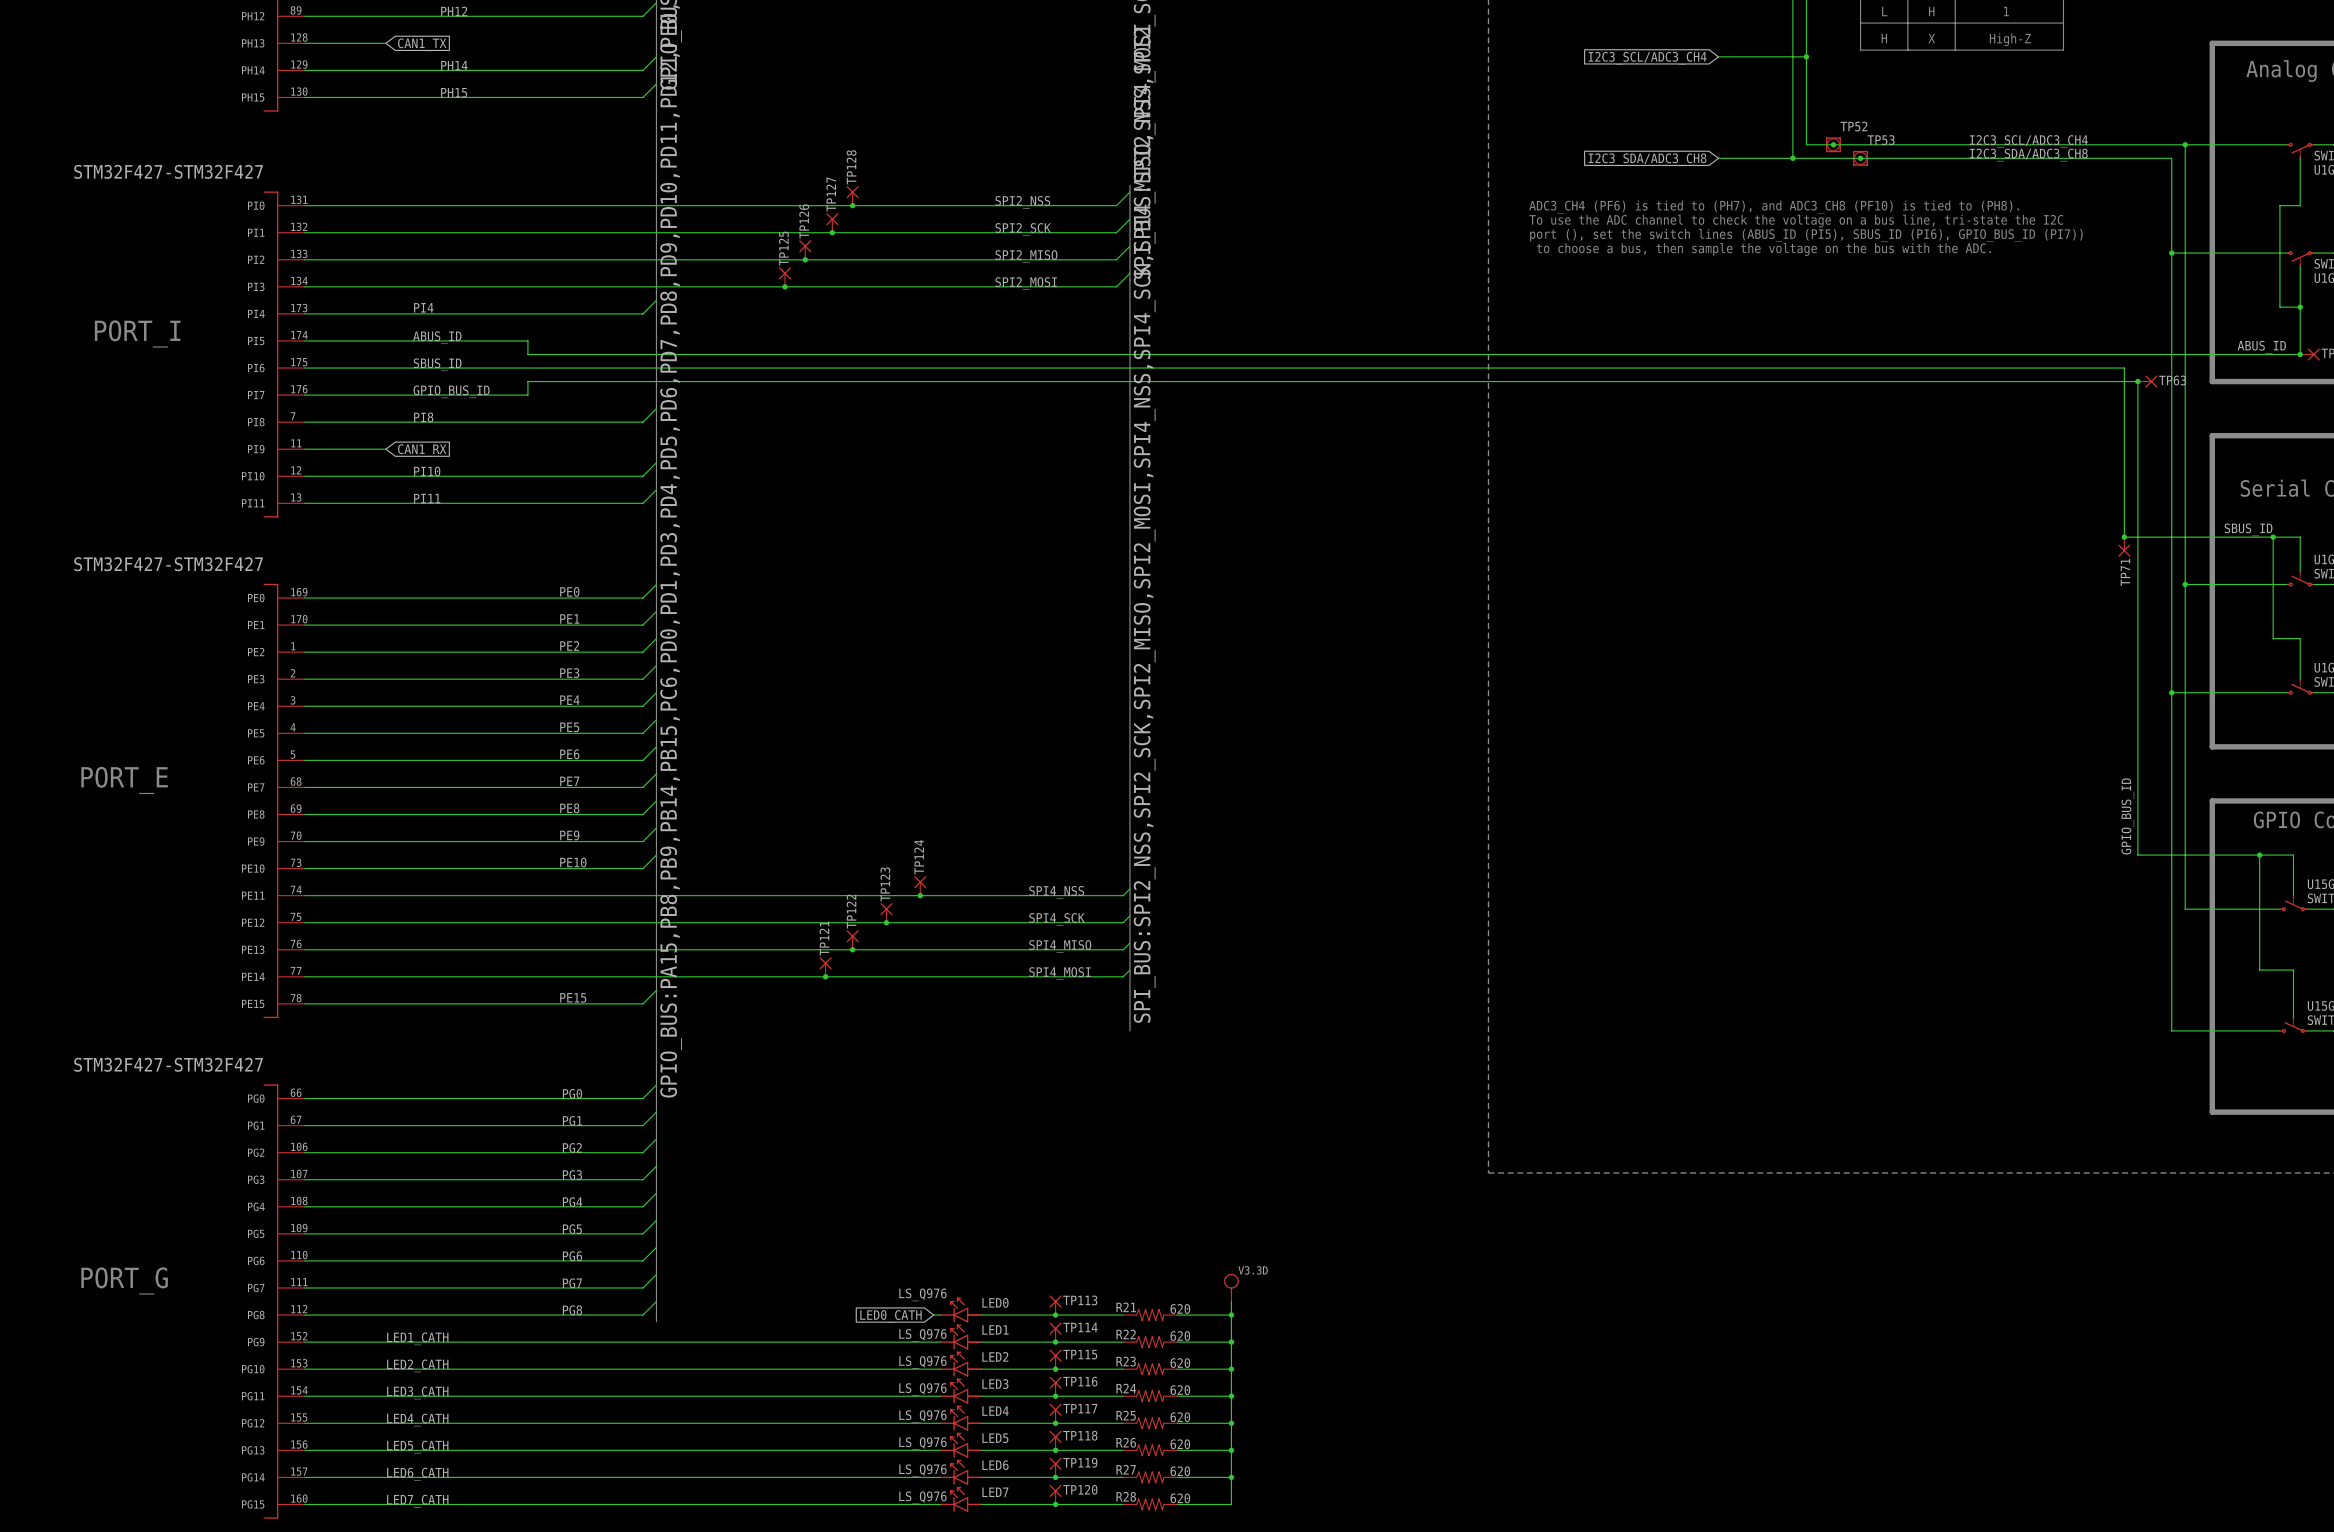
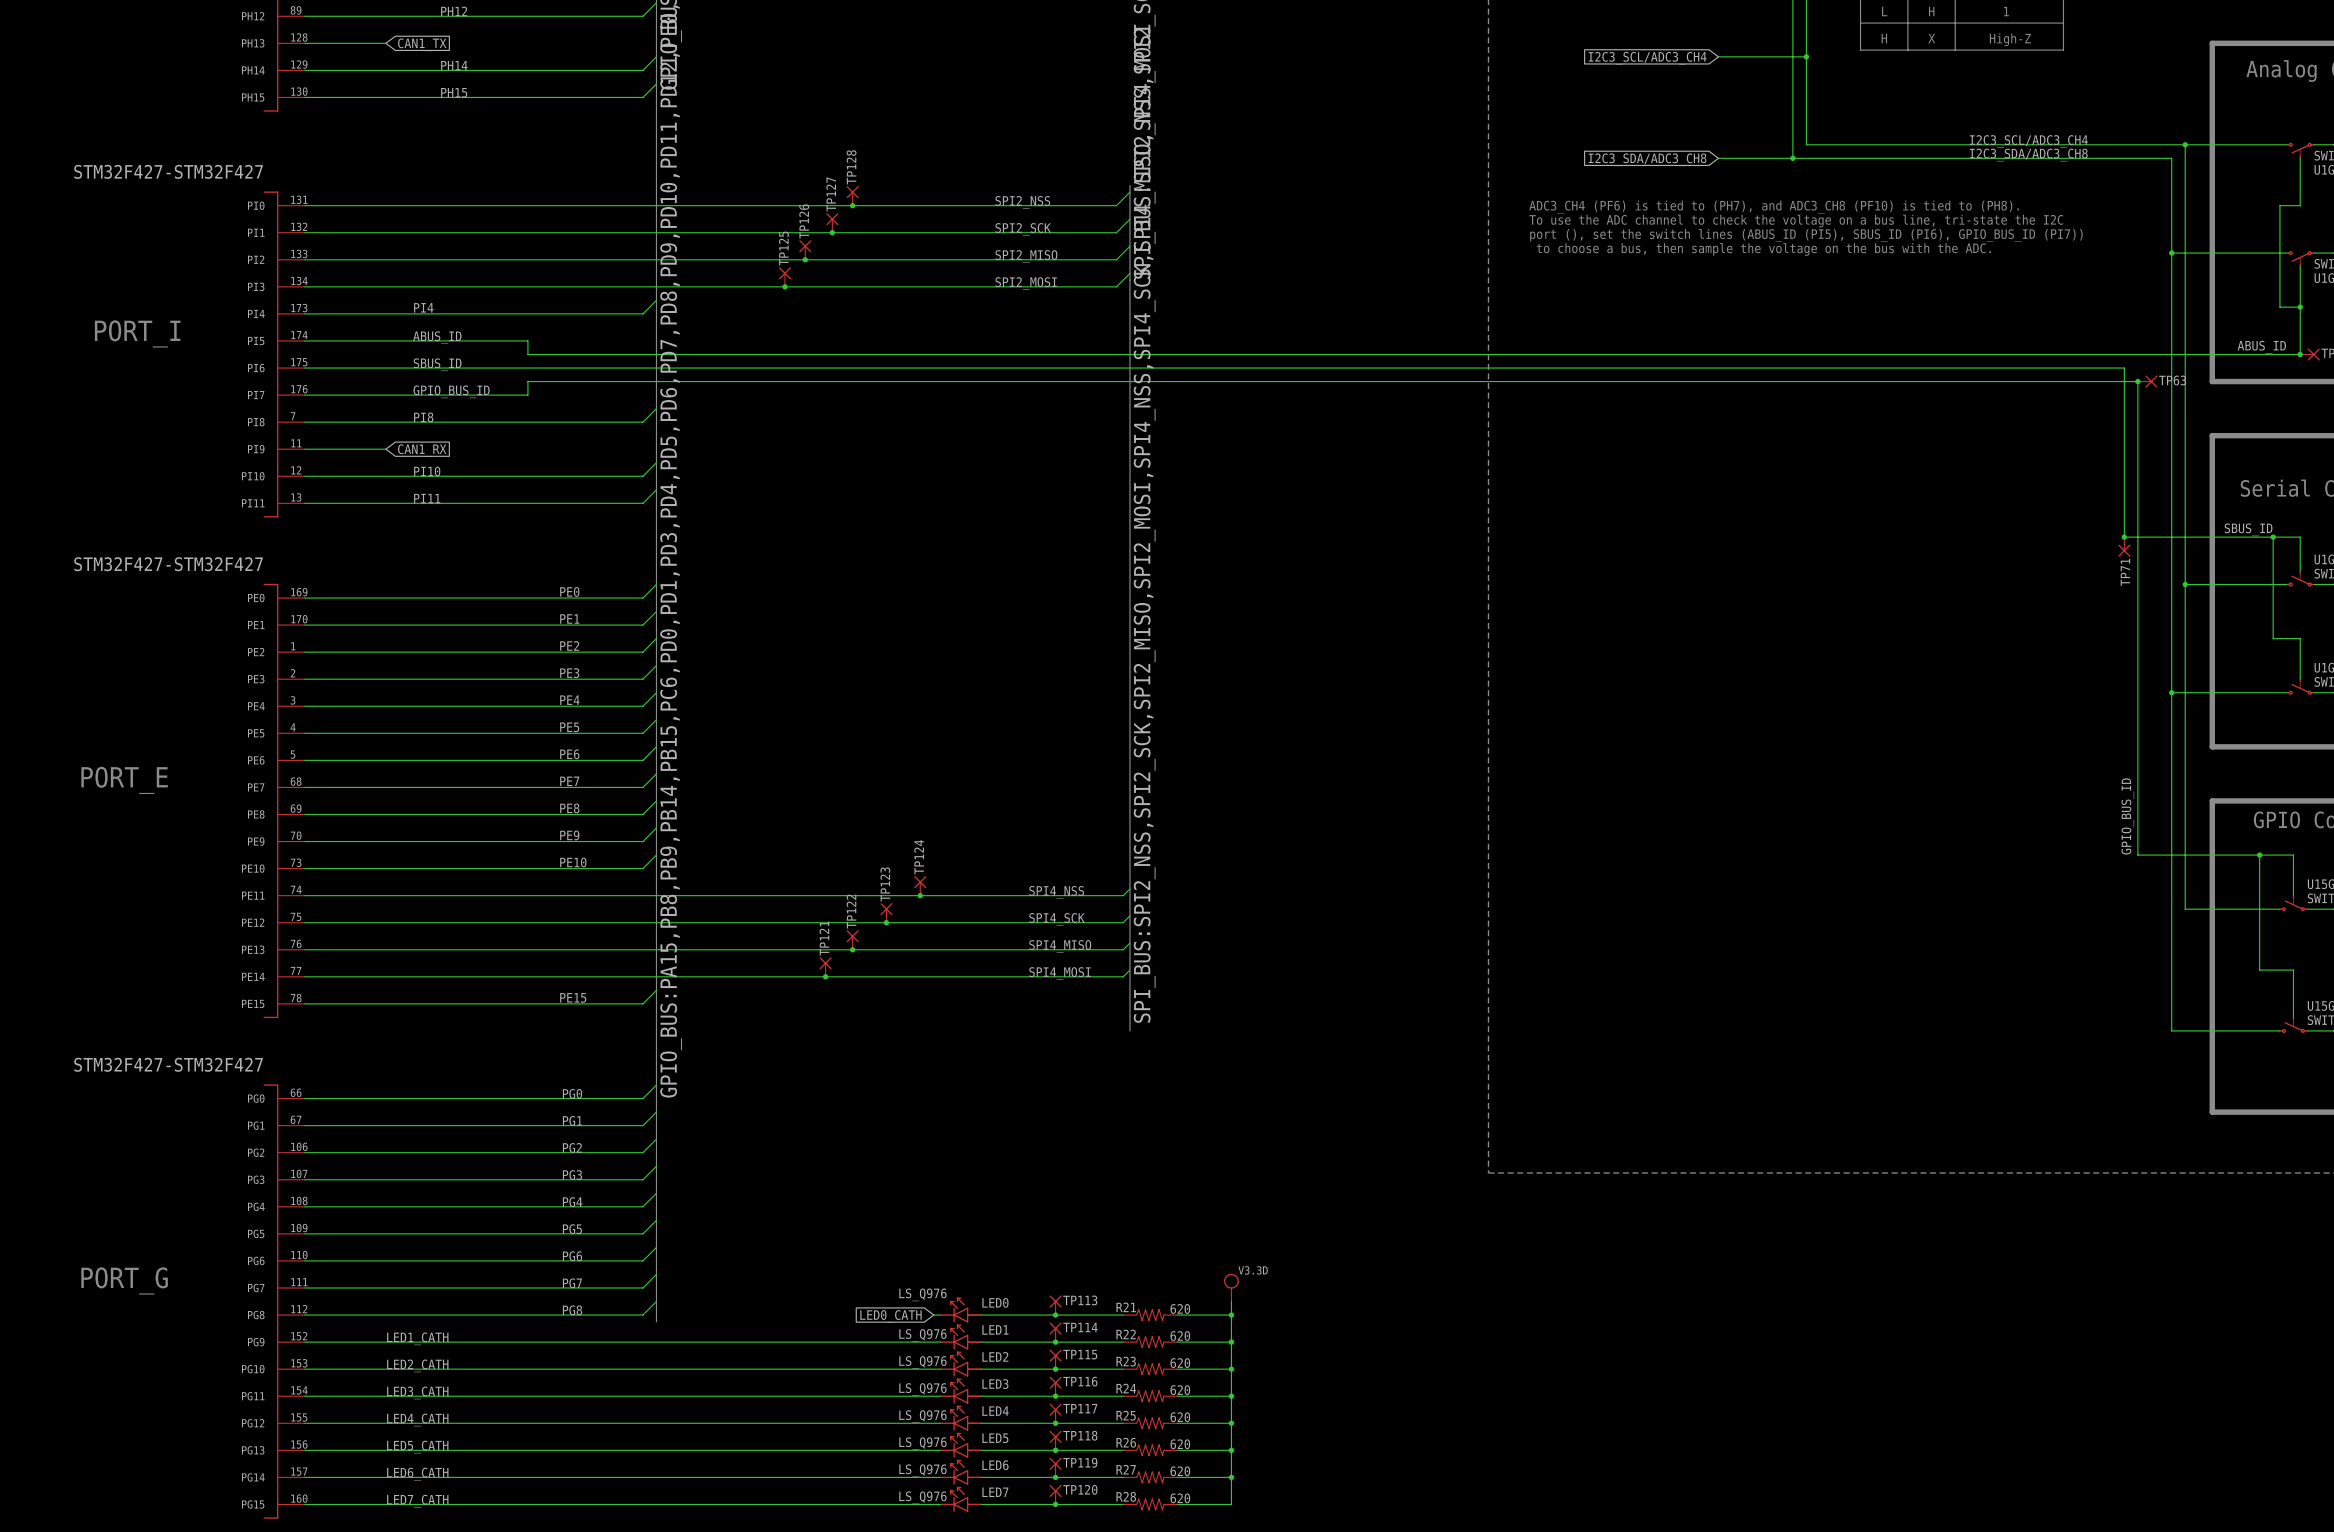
TP52: (1833, 144) -> none
junction: (1833, 144) -> none
TP53: (1860, 158) -> none
junction: (1860, 158) -> none

